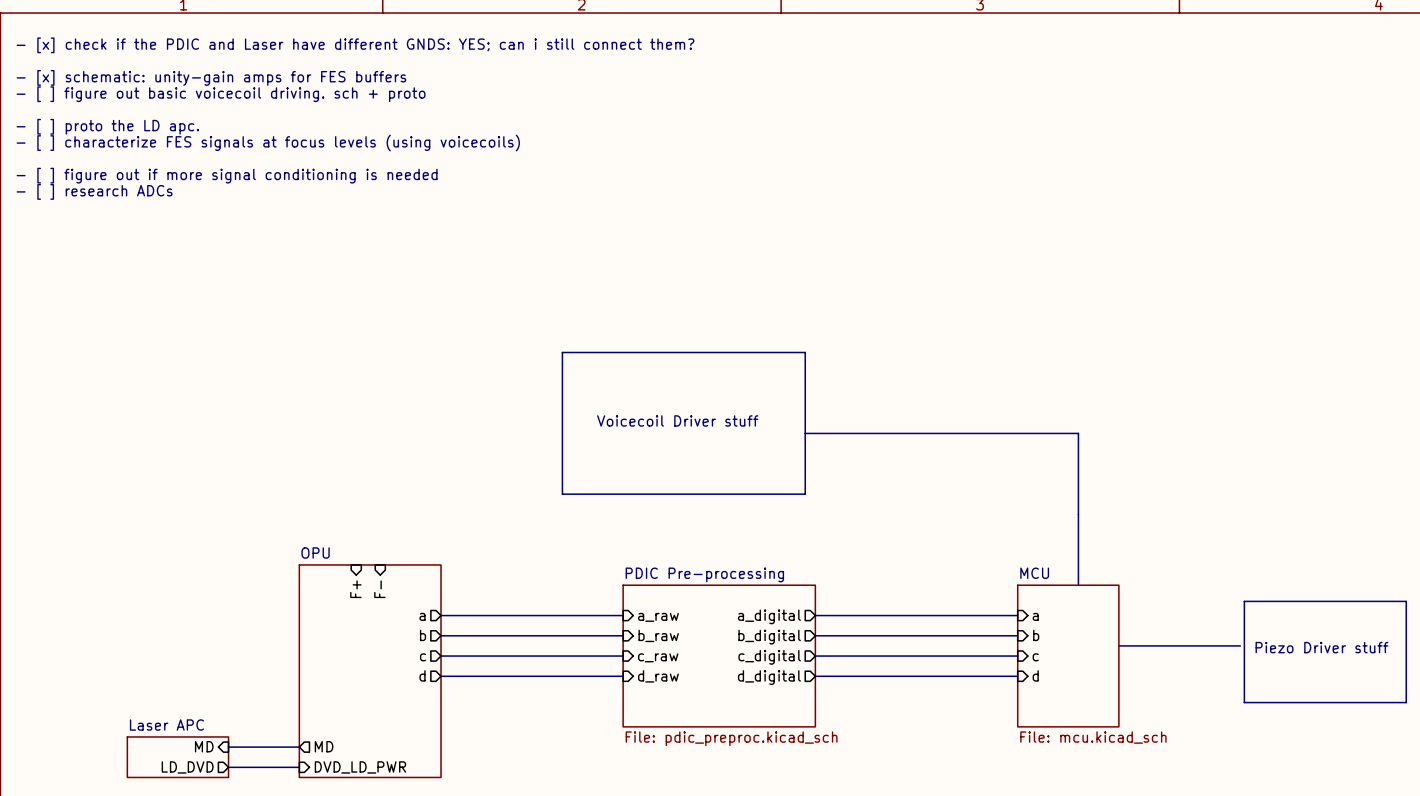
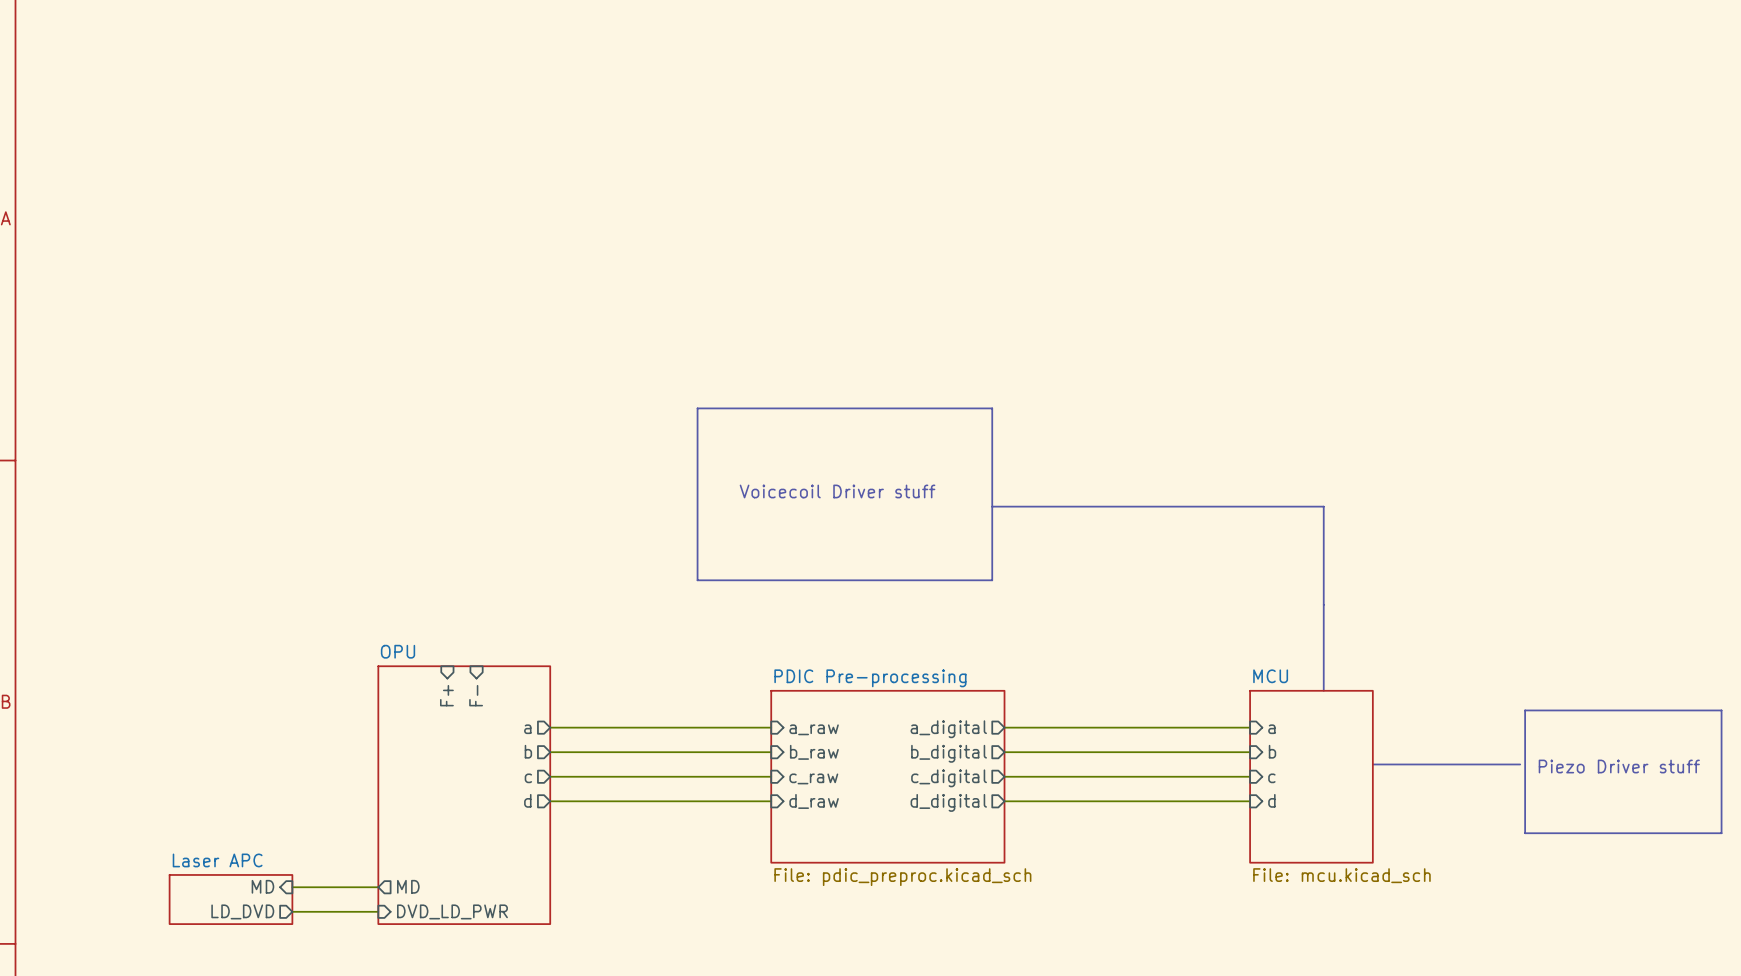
text: - [x] check if the PDIC and Laser have different GNDS: YES; can i still connect them? (355, 45) -> none
text: - [x] schematic: unity-gain amps for FES buffers (211, 77) -> none
text: - [ ] figure out basic voicecoil driving. sch + proto (221, 94) -> none
text: - [ ] proto the LD apc. (107, 126) -> none
text: - [ ] characterize FES signals at focus levels (using voicecoils) (268, 143) -> none
text: - [ ] figure out if more signal conditioning is needed (227, 175) -> none
text: - [ ] research ADCs (94, 191) -> none

